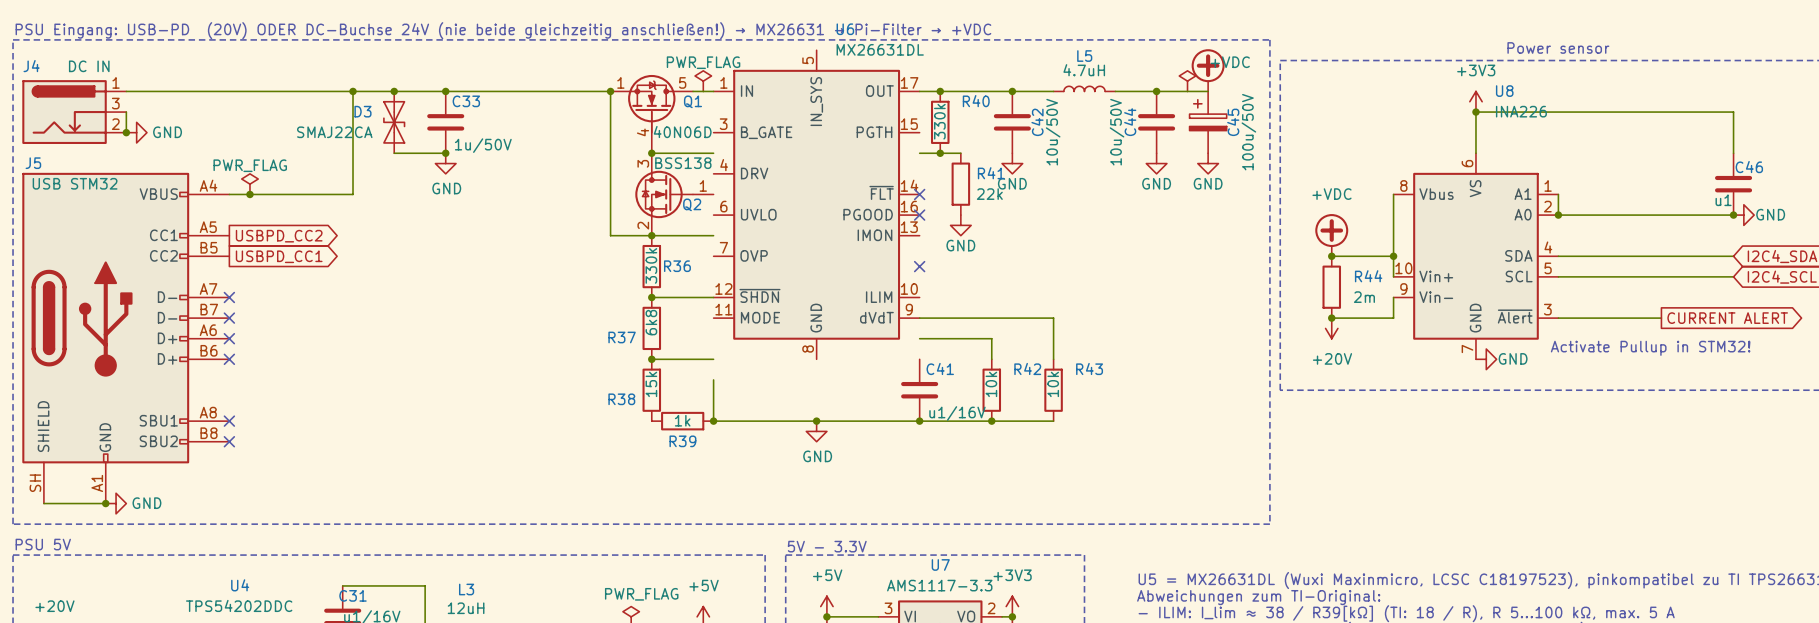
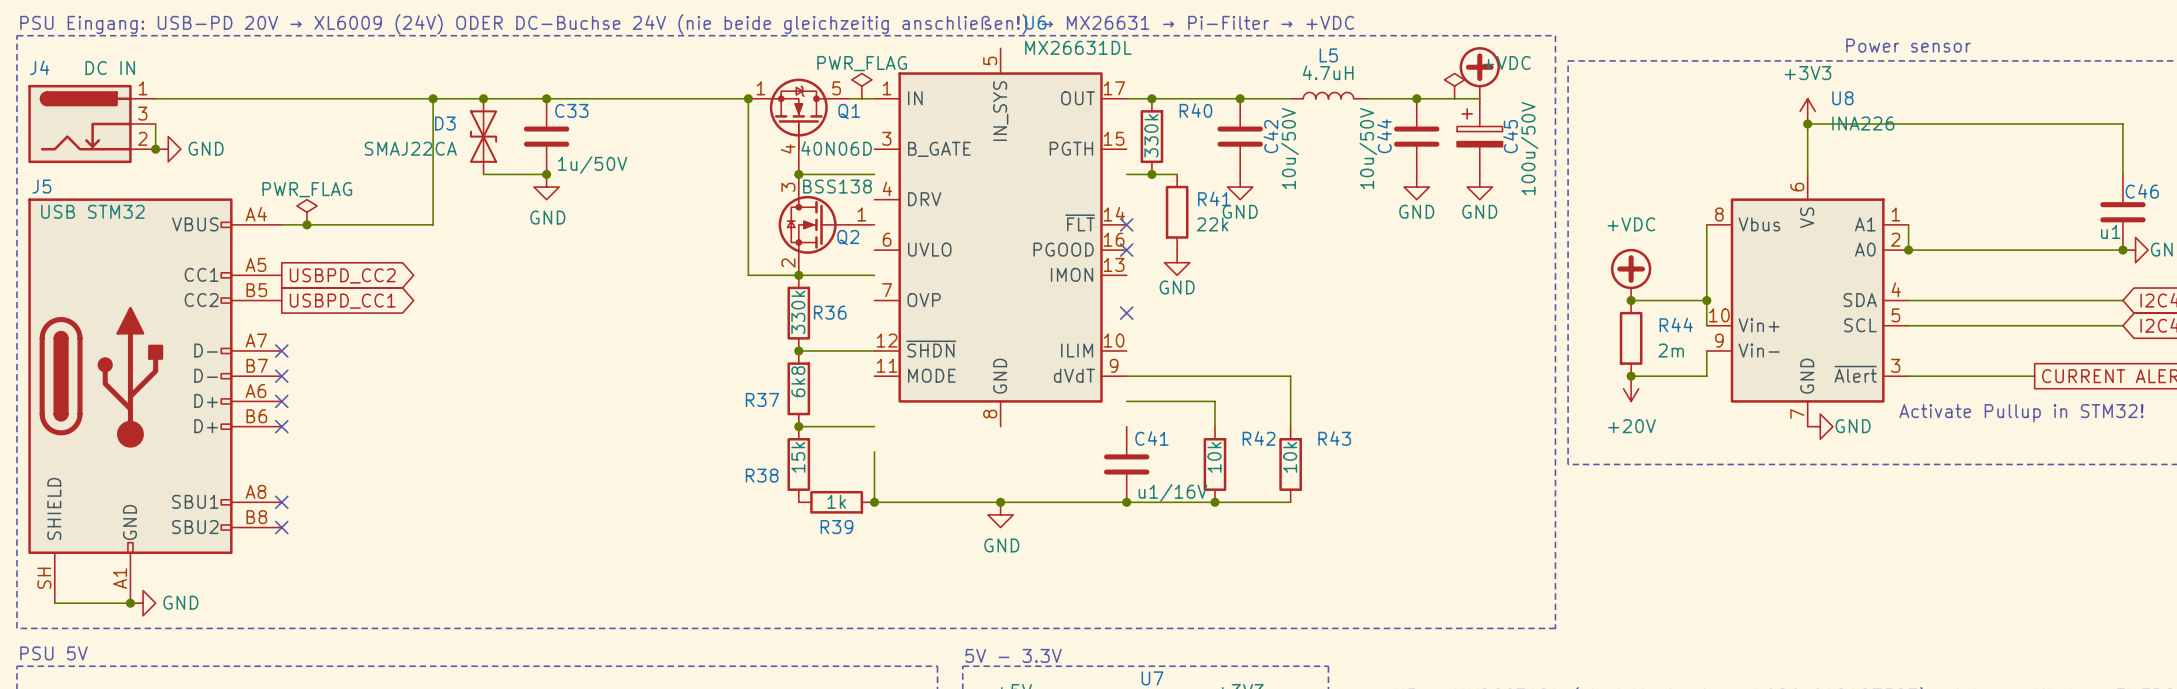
text: PSU Eingang: USB-PD (20V) ODER DC-Buchse 24V (nie beide gleichzeitig anschließen!) → MX26631 → Pi-Filter → +VDC (503, 30) -> PSU Eingang: USB-PD 20V → XL6009 (24V) ODER DC-Buchse 24V (nie beide gleichzeitig anschließen!) → MX26631 → Pi-Filter → +VDC (687, 24)

